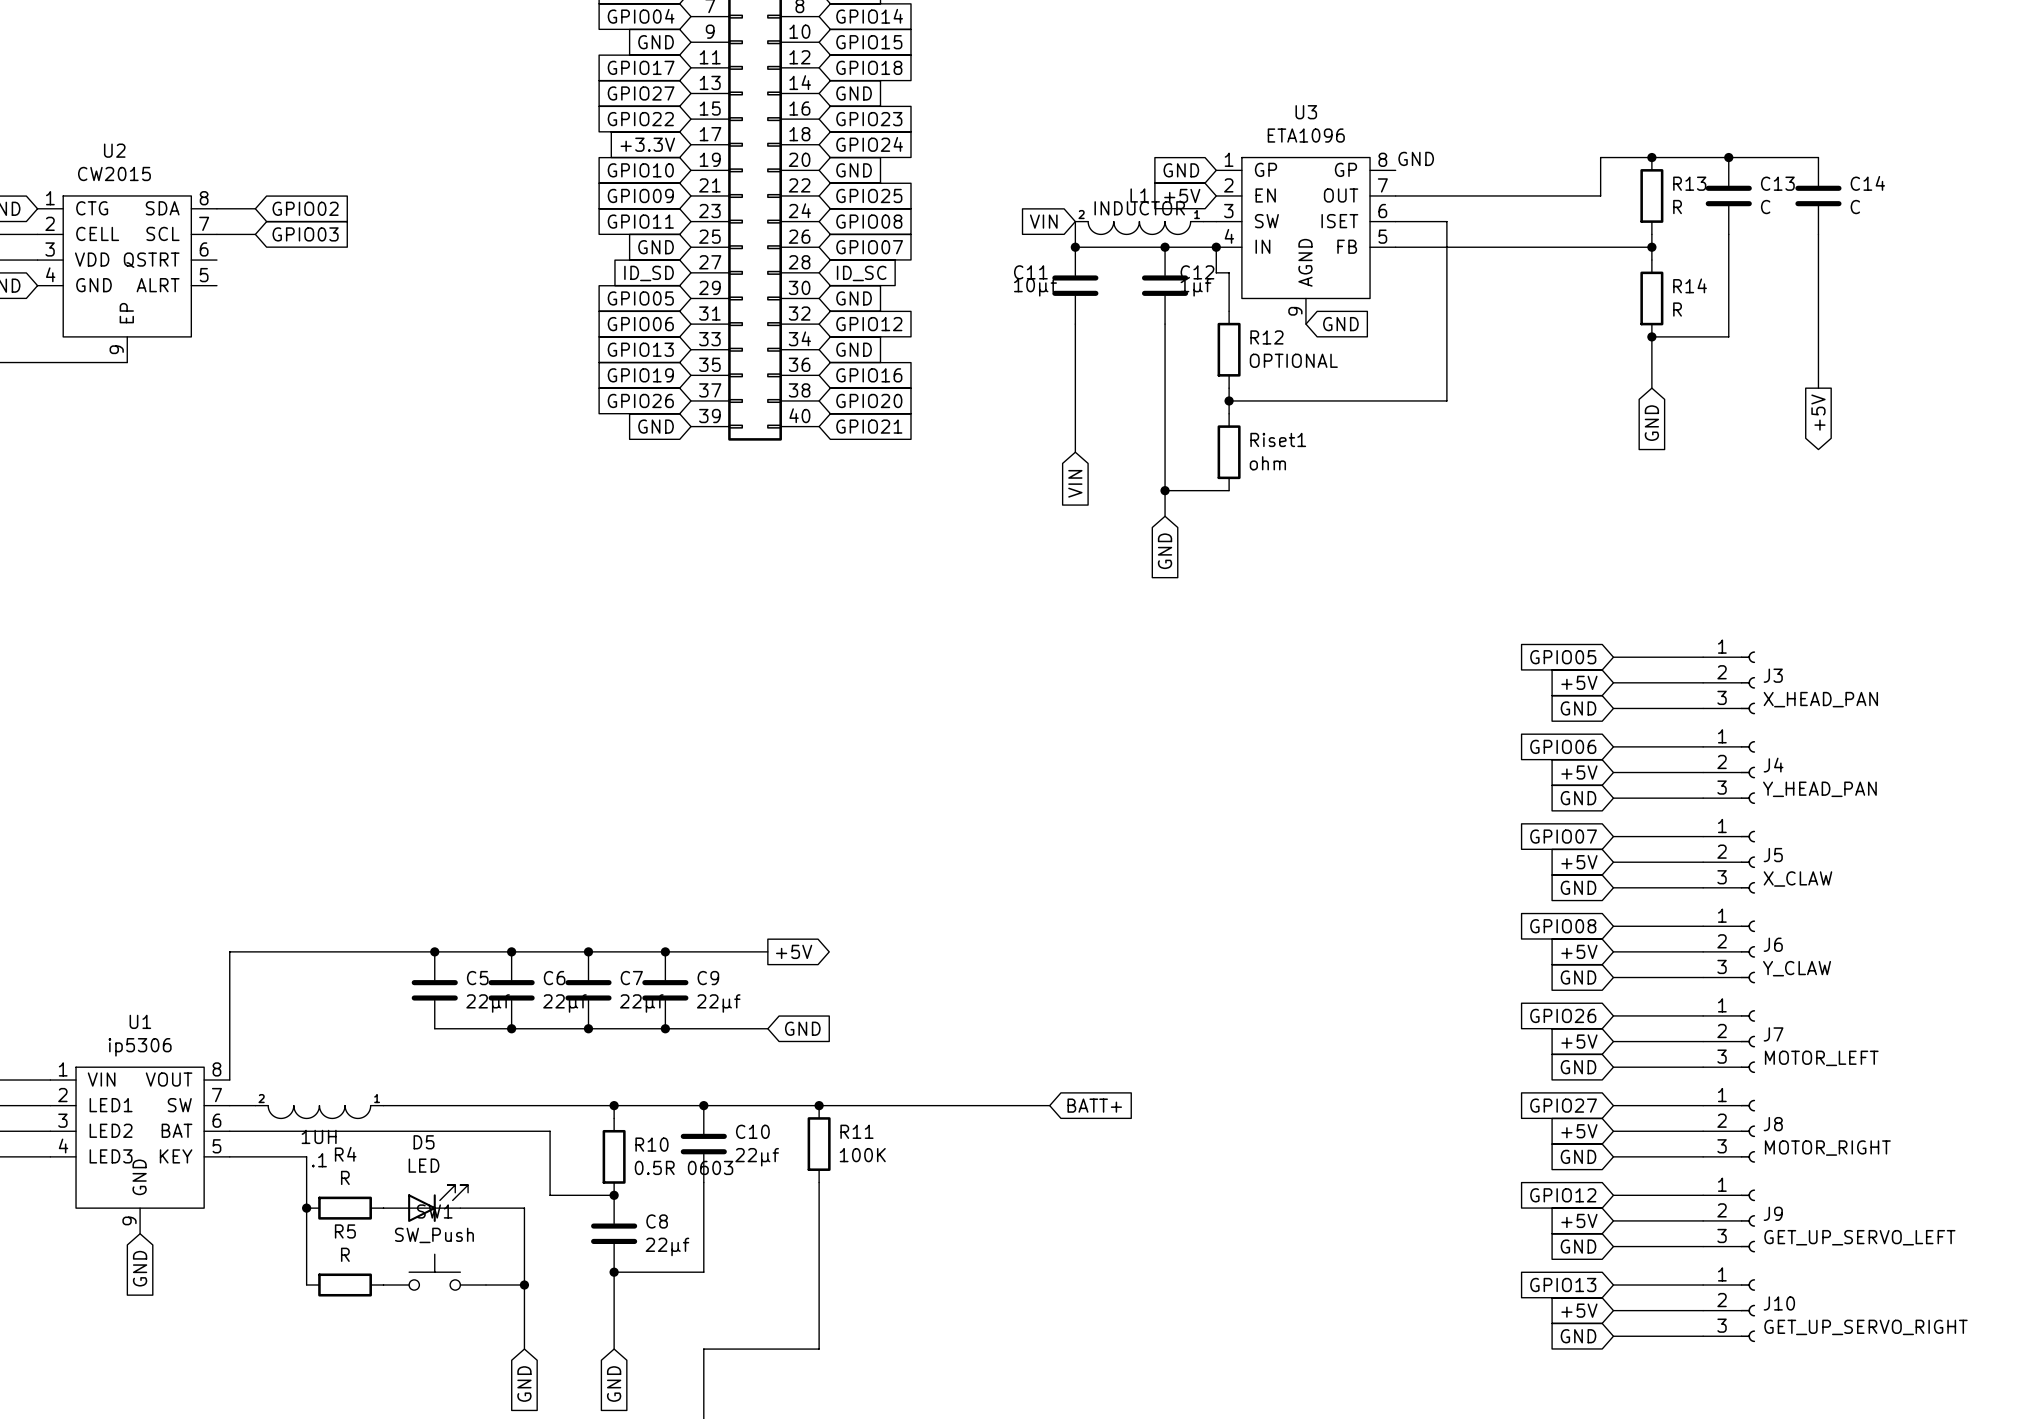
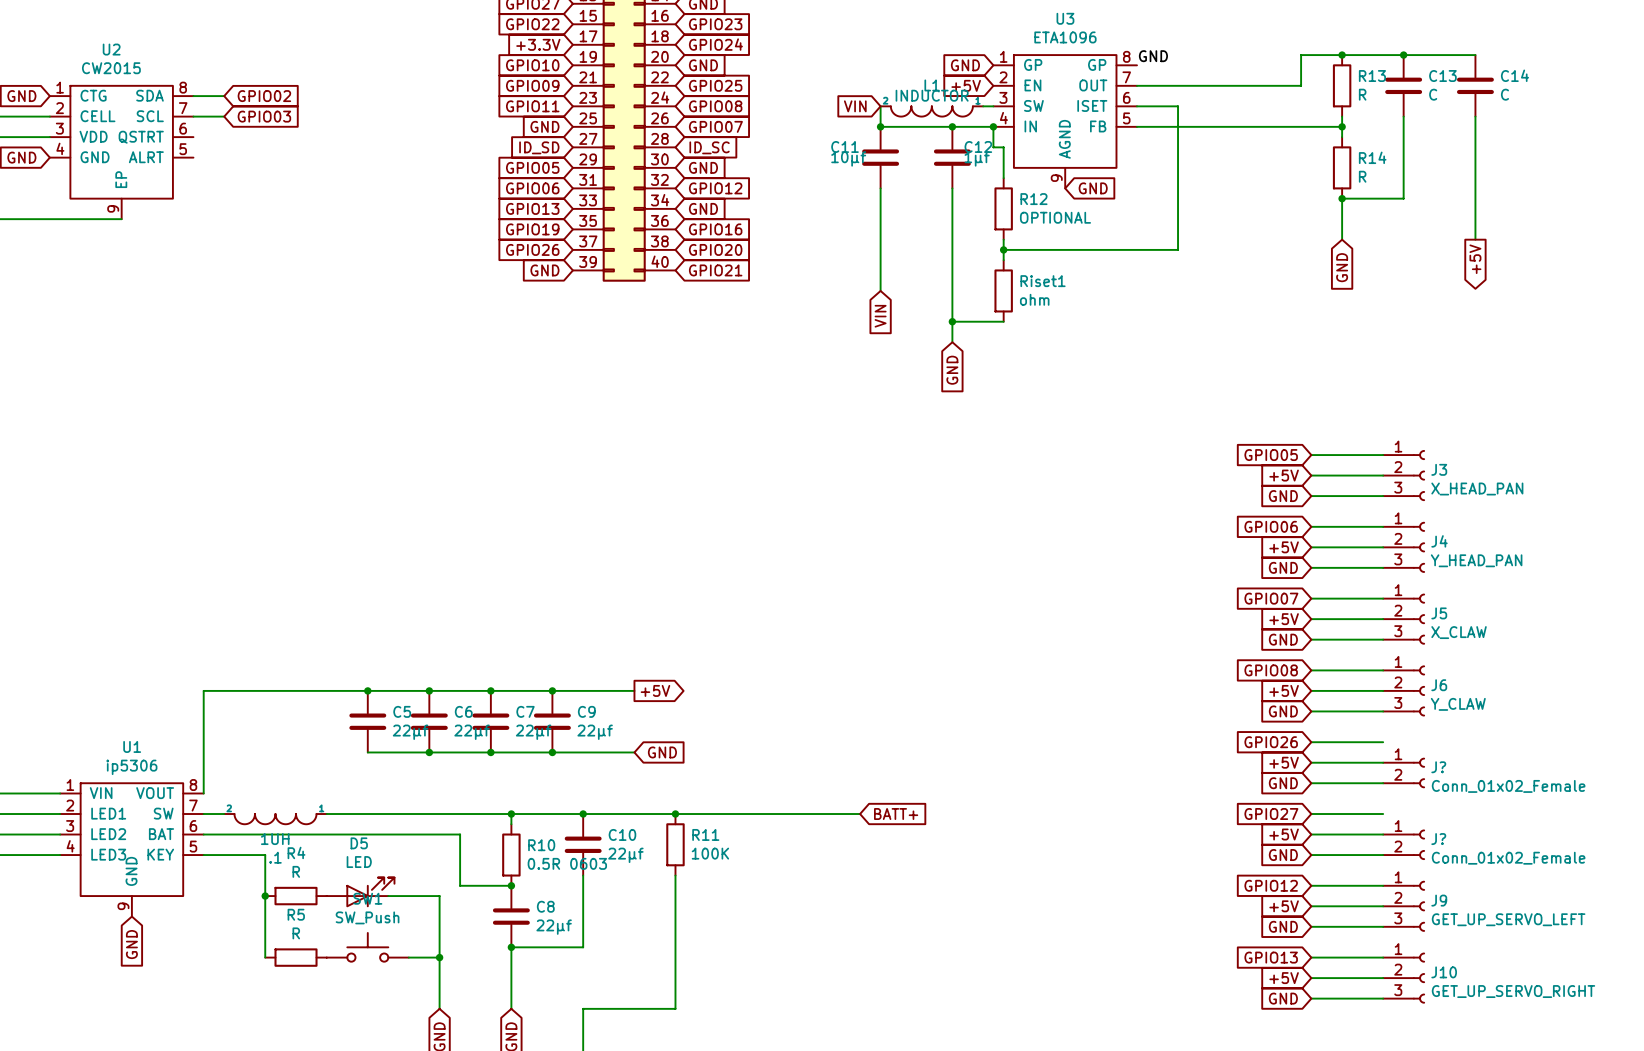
J7: MOTOR_LEFT (1729, 1041) -> none
J?: none -> Conn_01x02_Female (1403, 772)
J8: MOTOR_RIGHT (1729, 1131) -> none
J?: none -> Conn_01x02_Female (1403, 844)

